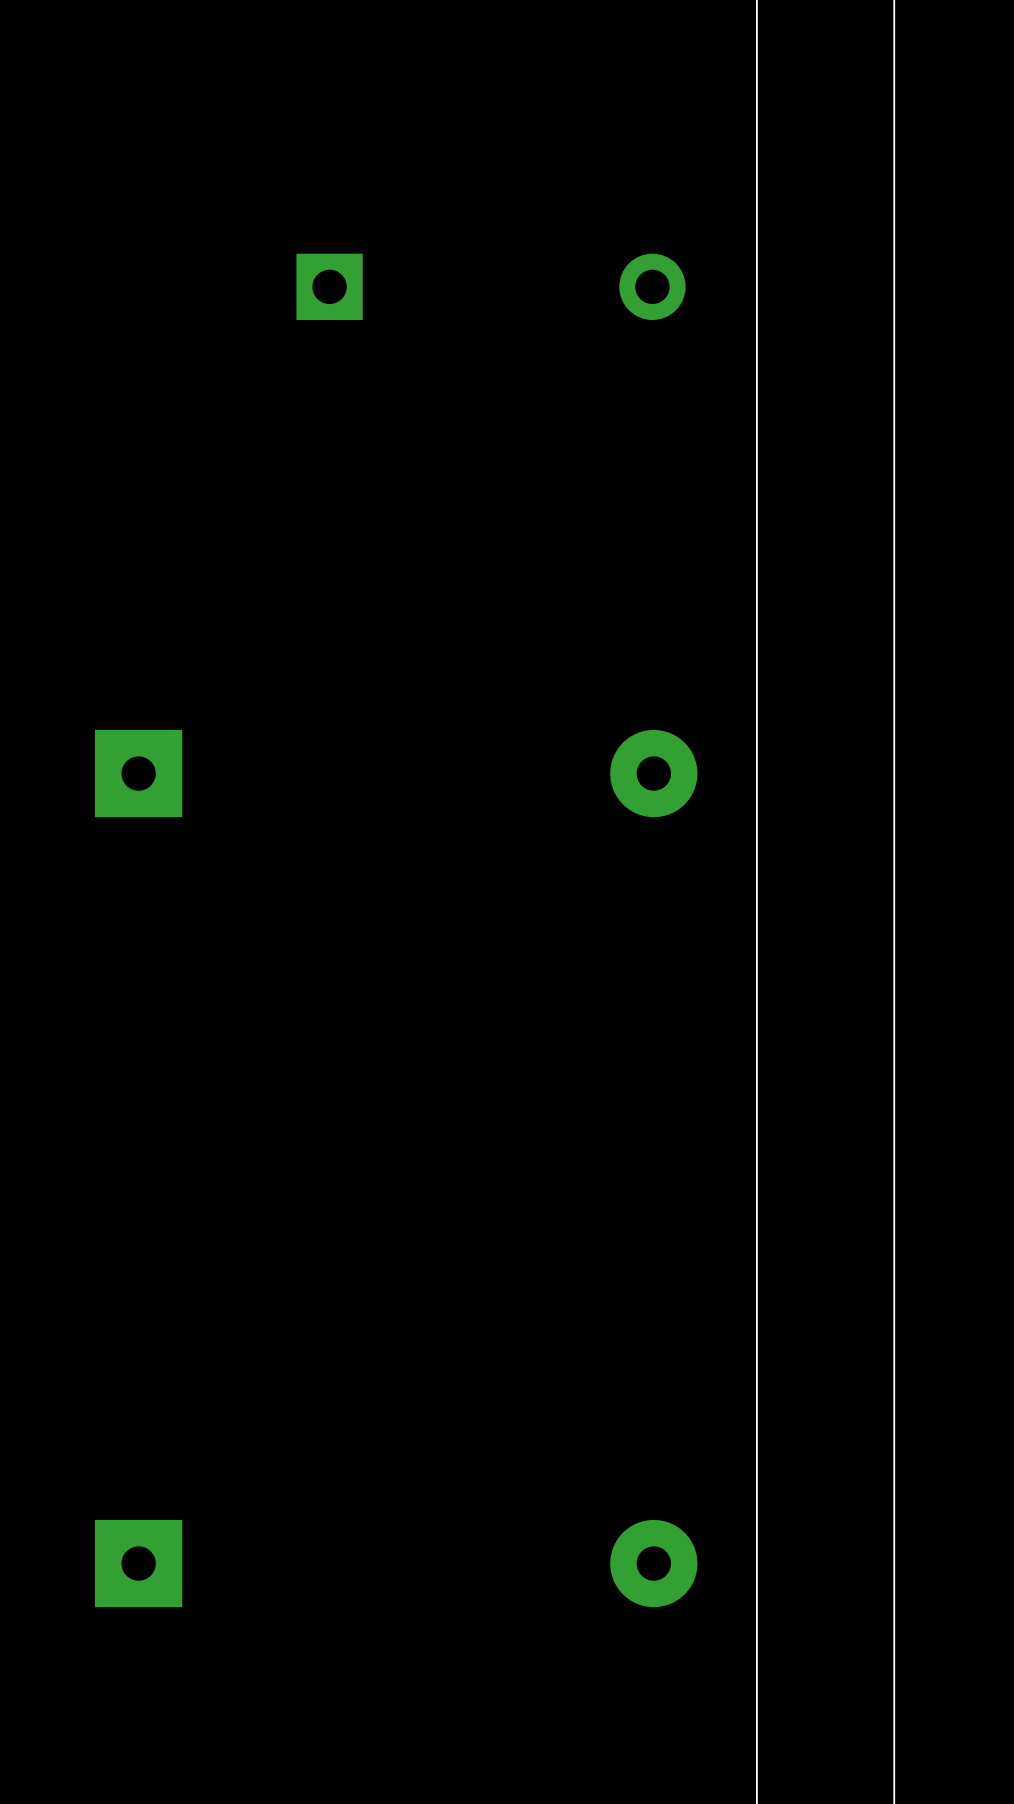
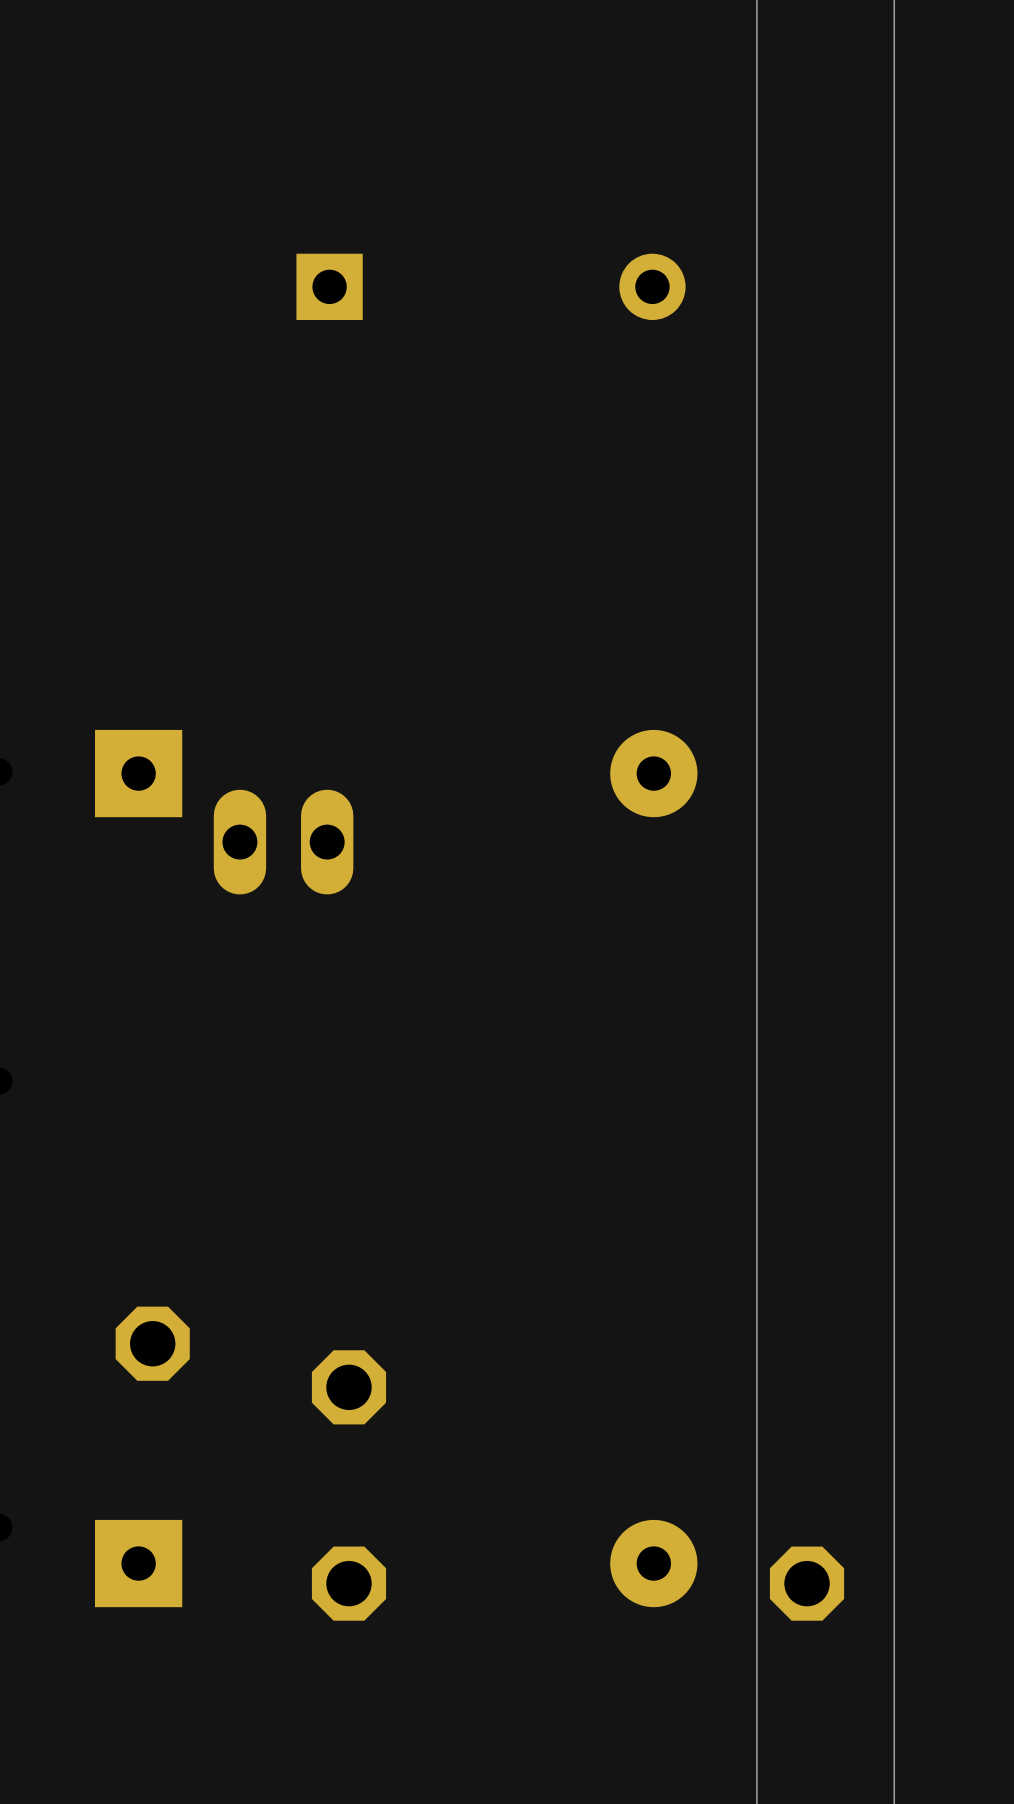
part: none -> (283, 842)
part: none -> (152, 1343)
part: none -> (349, 1387)
part: none -> (349, 1583)
part: none -> (807, 1583)

